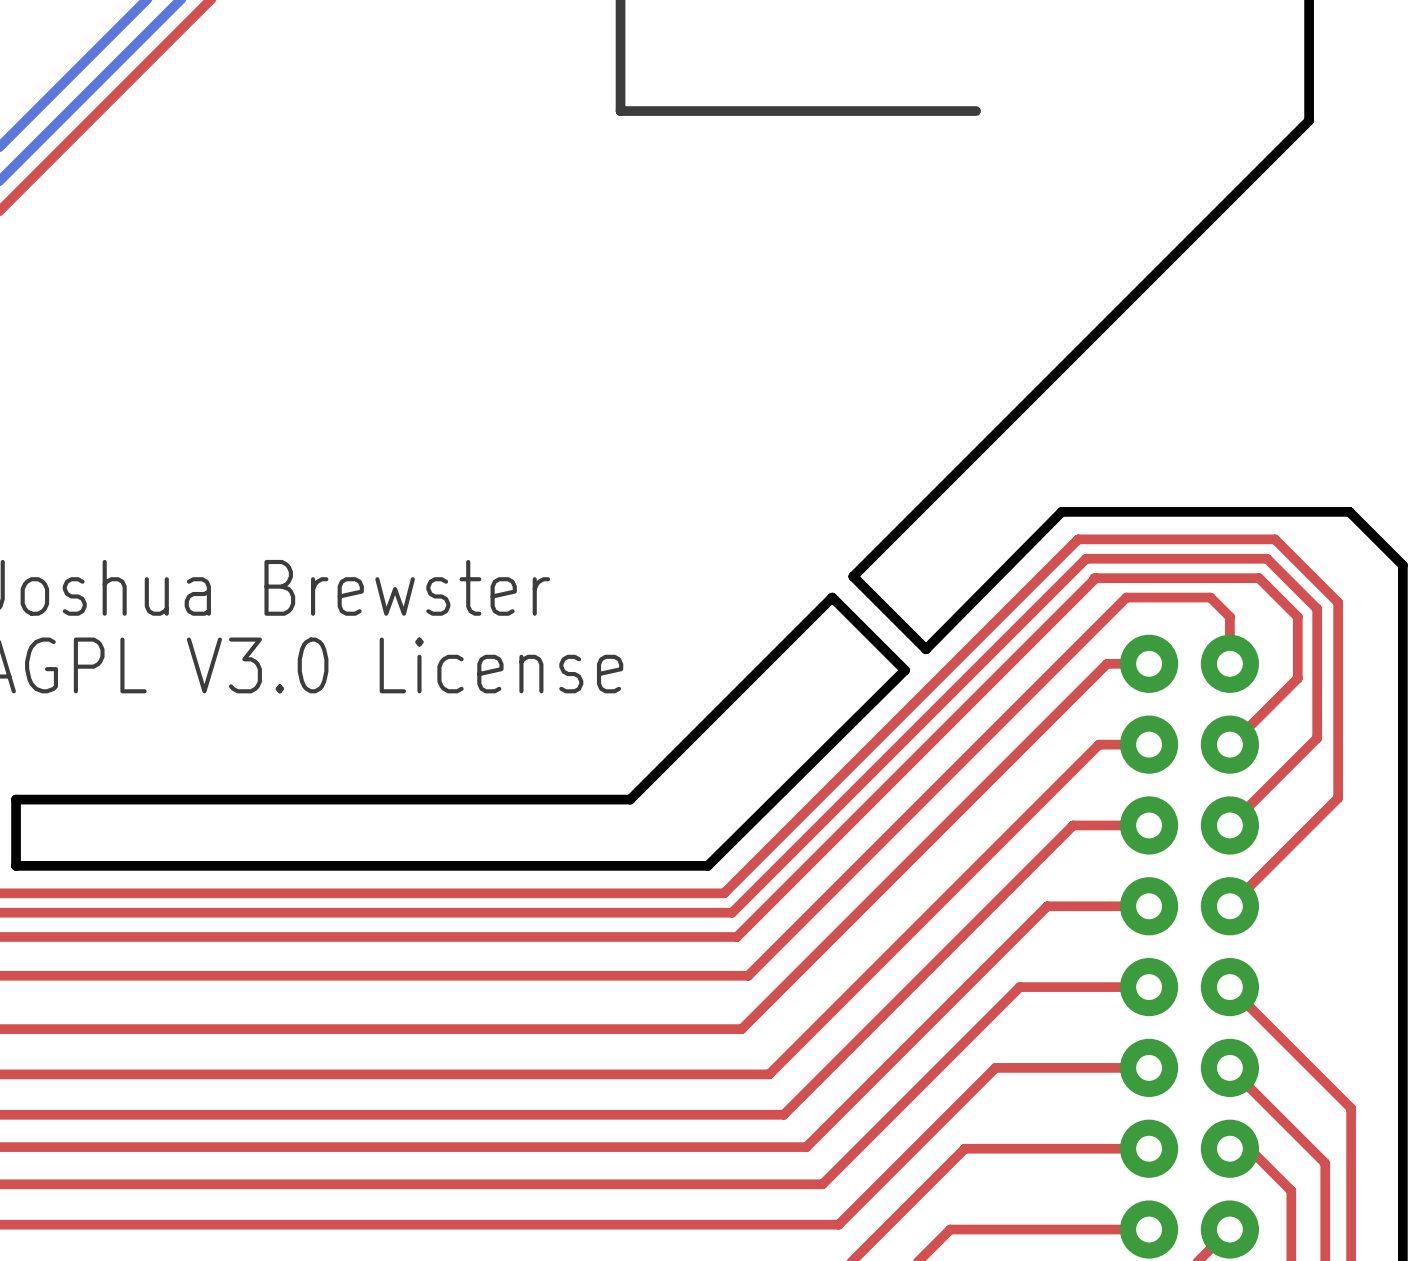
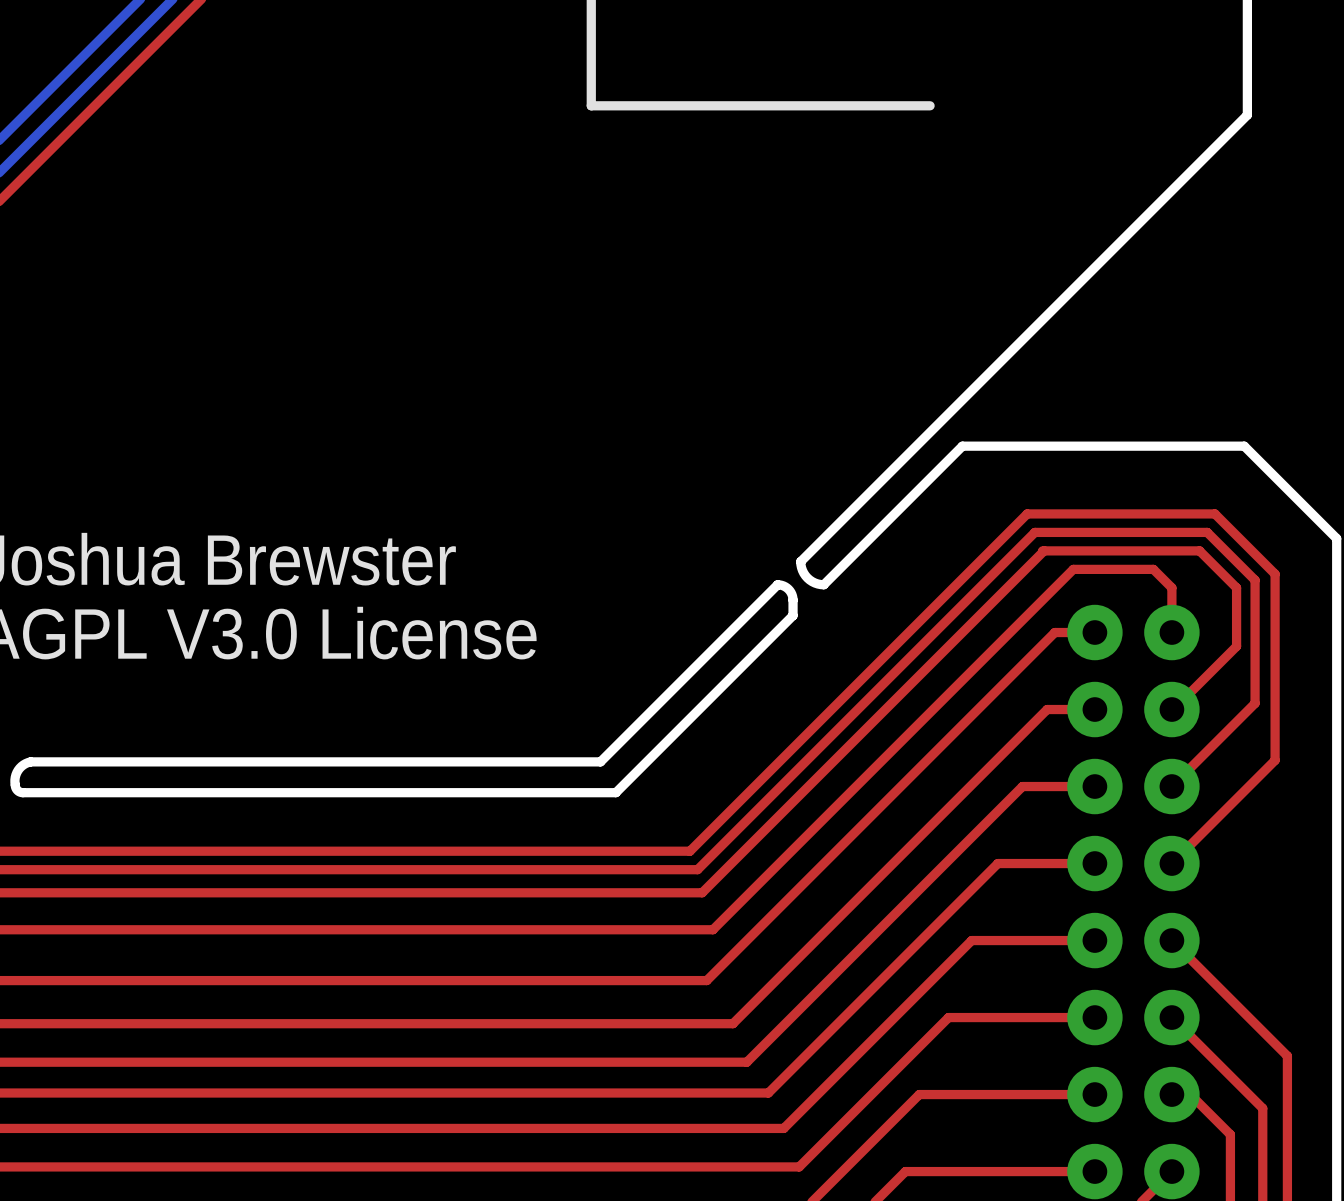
board edge: (1349, 511) (1061, 511) (926, 649) (853, 576) -> (1285, 487) (1244, 446) (962, 446) (823, 584) (809, 580) (801, 567) (800, 561) (813, 549)
board edge: (816, 613) (832, 597) (905, 670) (707, 865) (16, 865) (16, 799) (32, 799) -> (777, 584) (785, 586) (790, 592) (793, 615) (615, 792) (20, 792) (15, 786) (15, 774) (21, 766) (30, 761)

